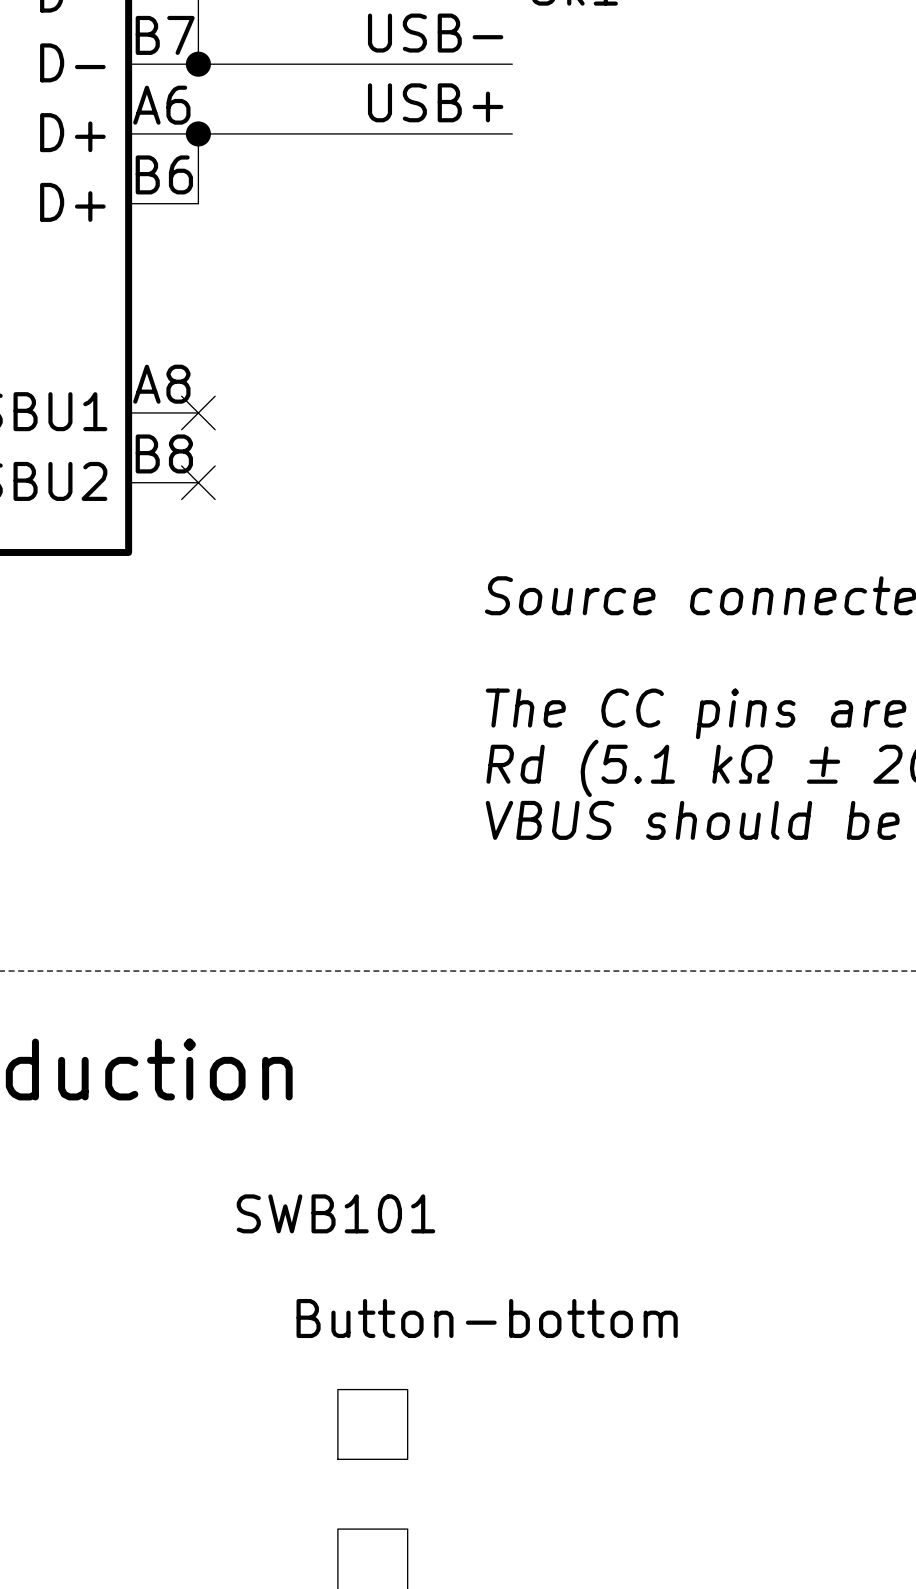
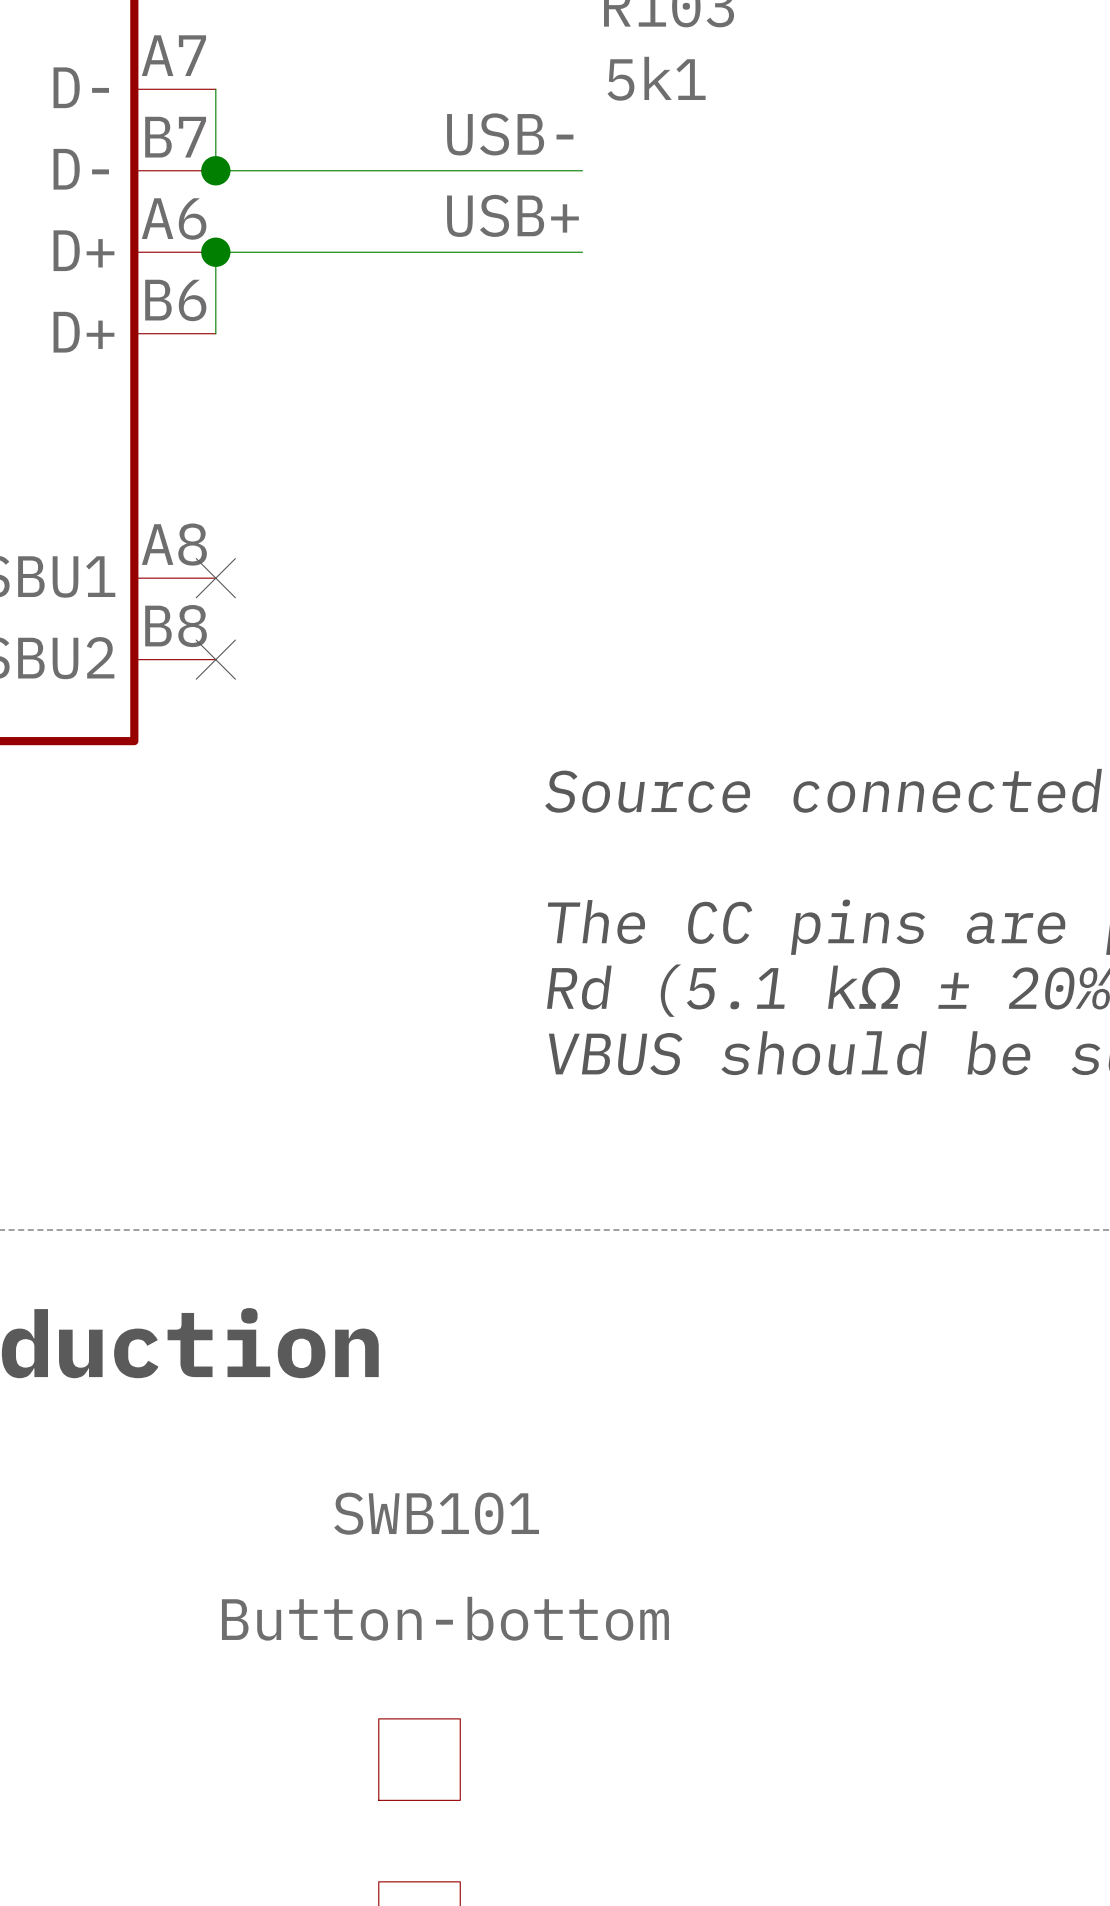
SWB101 name position: SWB101 (335, 1213) -> SWB101 (436, 1513)
SWB101 value position: Button-bottom (487, 1318) -> Button-bottom (445, 1618)

